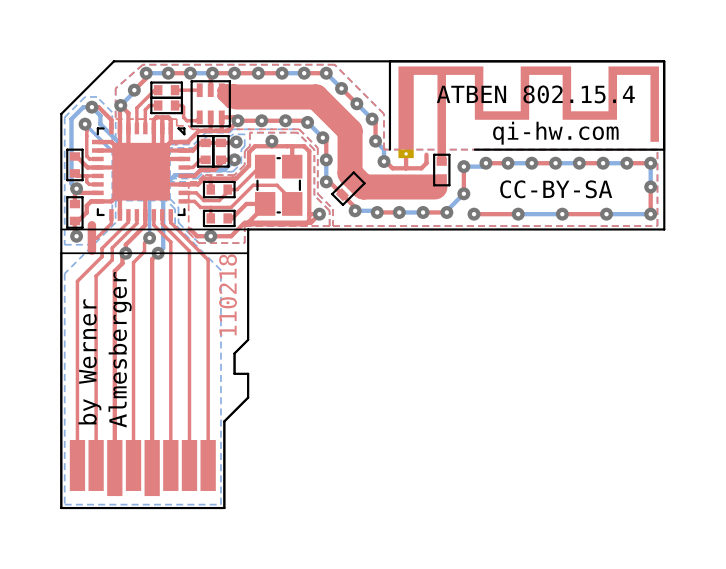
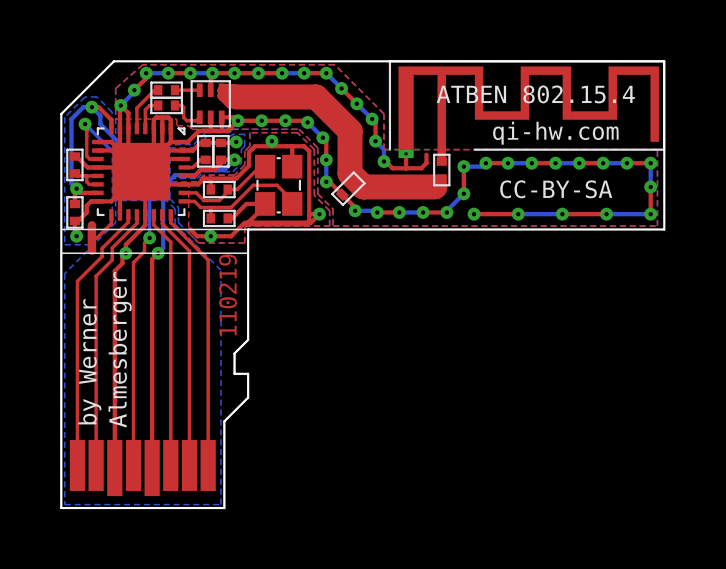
text: 110218 (228, 294) -> 110219 (228, 295)

